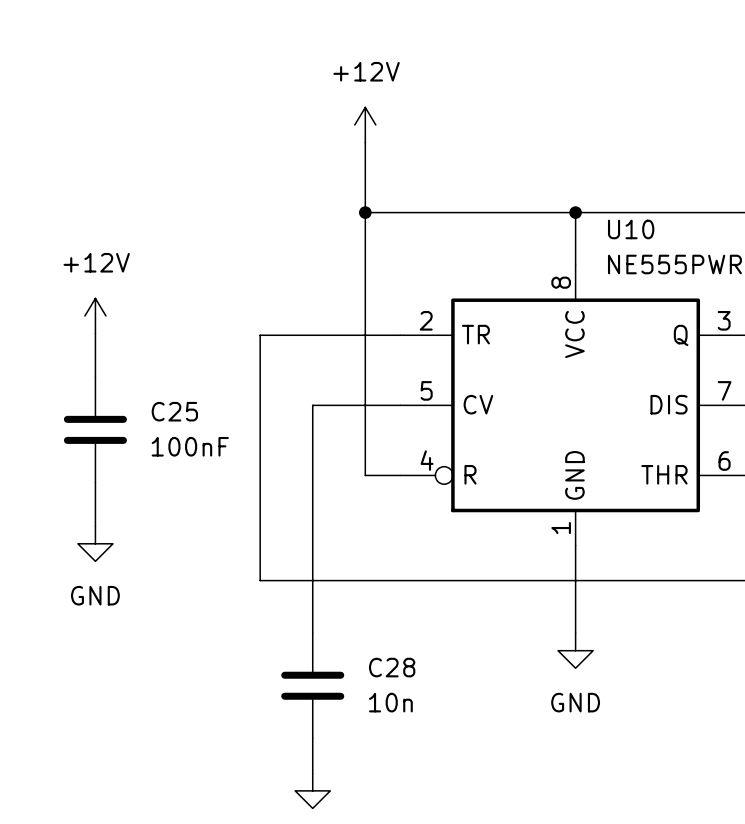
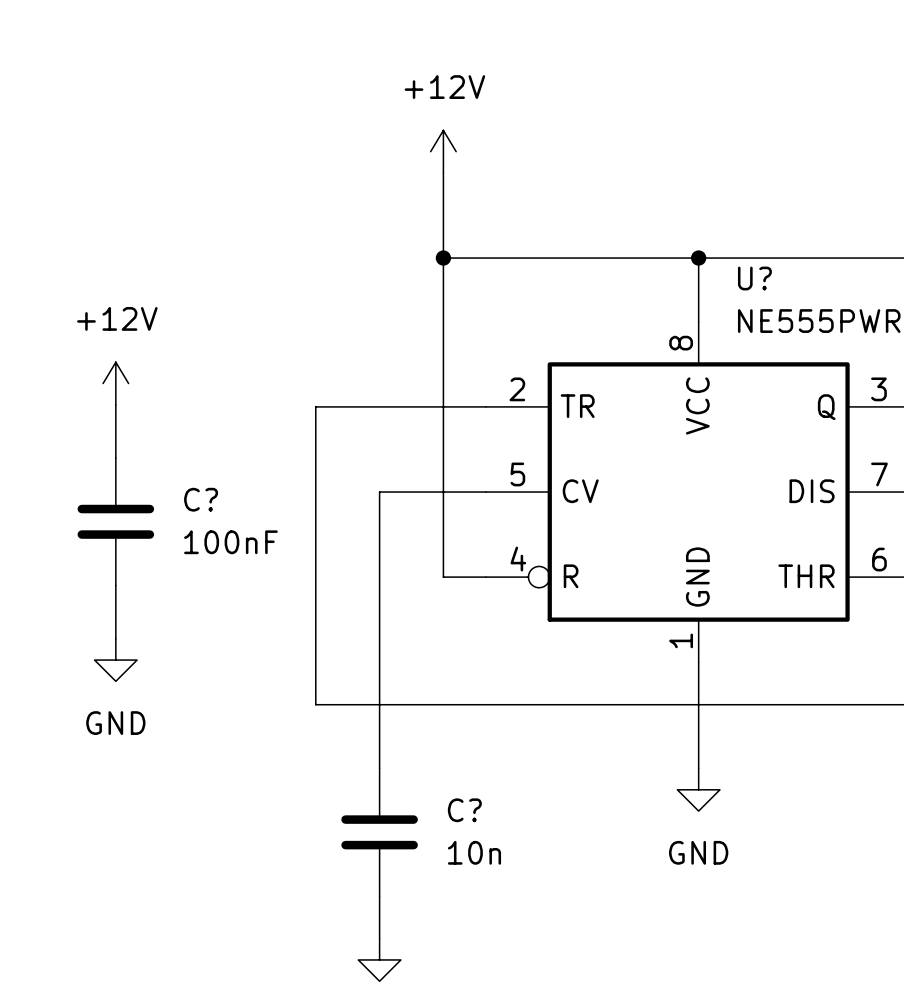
U10 name: U10 (631, 229) -> U? (754, 278)
C25 name: C25 (174, 411) -> C? (201, 499)
C28 name: C28 (392, 667) -> C? (464, 810)

